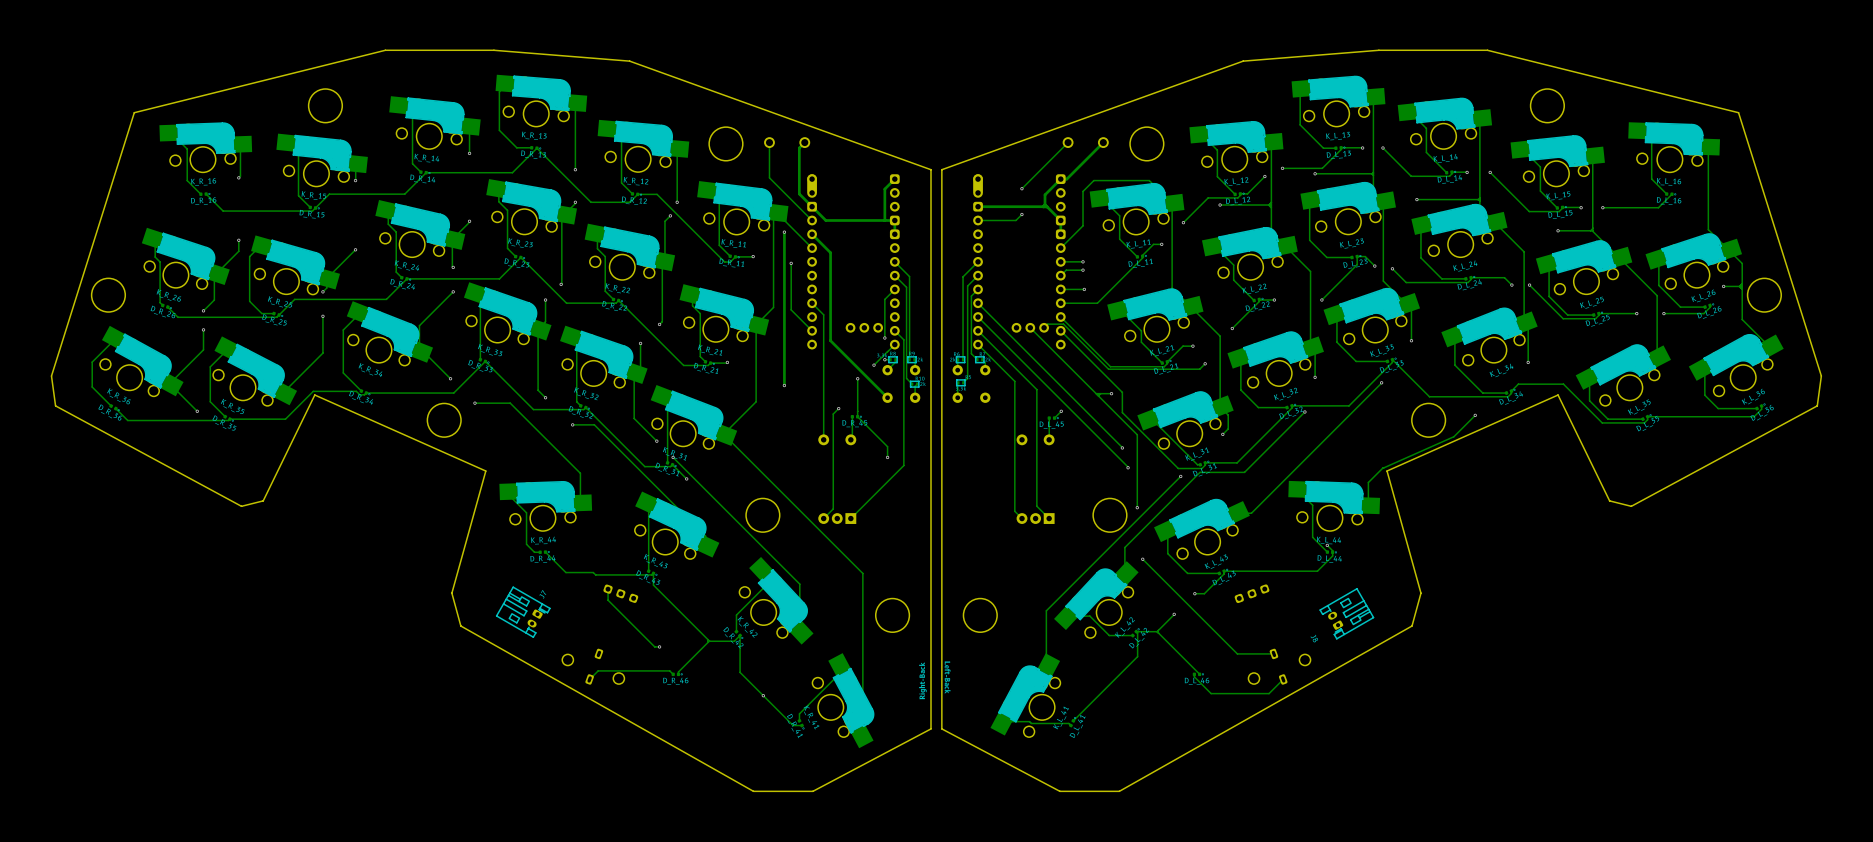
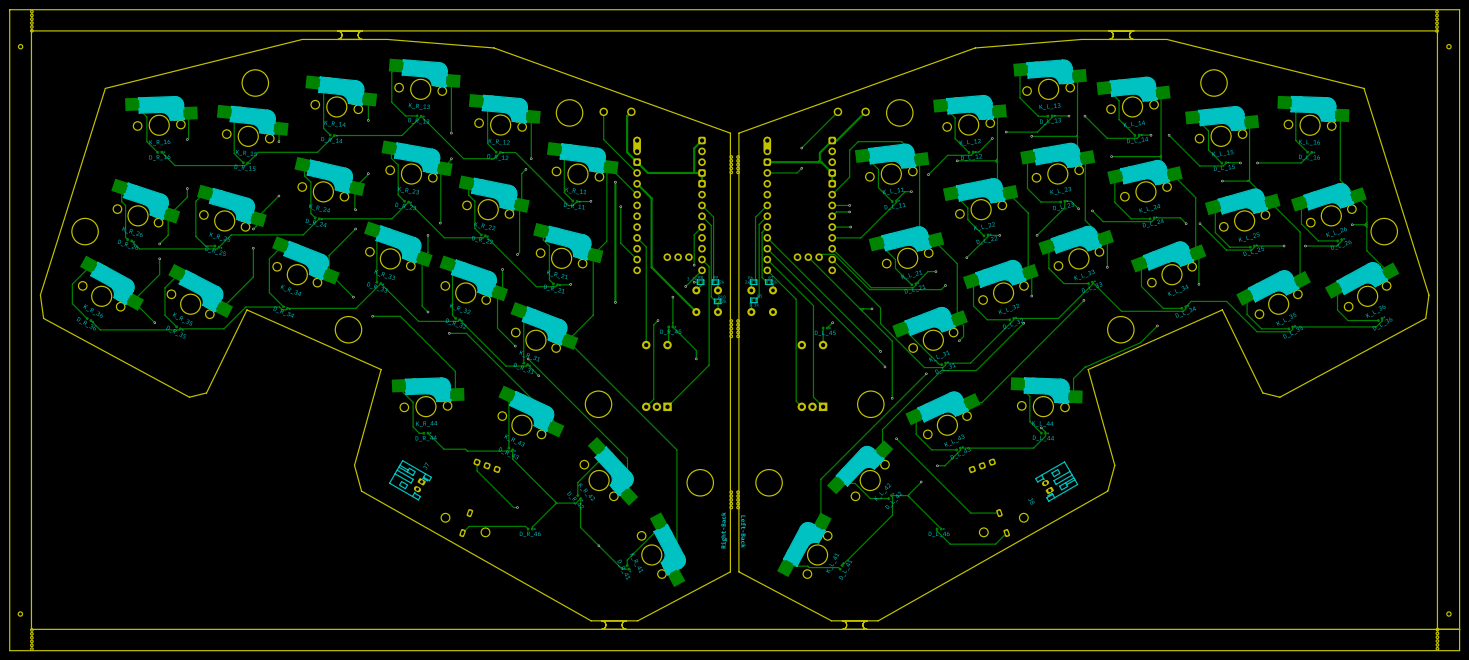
board edge: none -> (1459, 9) (1459, 650) (9, 650) (9, 9) (1459, 9)
part: none -> (31, 21)
part: none -> (1437, 21)
board edge: none -> (337, 30) (341, 35) (337, 39)
board edge: none -> (362, 30) (358, 35) (362, 39)
board edge: none -> (1109, 30) (1113, 35) (1109, 39)
board edge: none -> (1133, 30) (1129, 35) (1133, 39)
part: none -> (20, 46)
part: none -> (1448, 46)
part: none -> (731, 164)
part: none -> (738, 164)
part: none -> (731, 328)
part: none -> (738, 328)
part: none -> (731, 499)
part: none -> (738, 499)
part: none -> (20, 614)
part: none -> (1448, 614)
board edge: none -> (601, 620) (605, 625) (601, 629)
board edge: none -> (626, 620) (622, 625) (626, 629)
board edge: none -> (842, 620) (846, 625) (842, 629)
board edge: none -> (867, 620) (862, 625) (867, 629)
board edge: none -> (1459, 629) (31, 629) (31, 30) (1437, 30) (1437, 629)
part: none -> (1437, 639)
part: none -> (31, 639)

